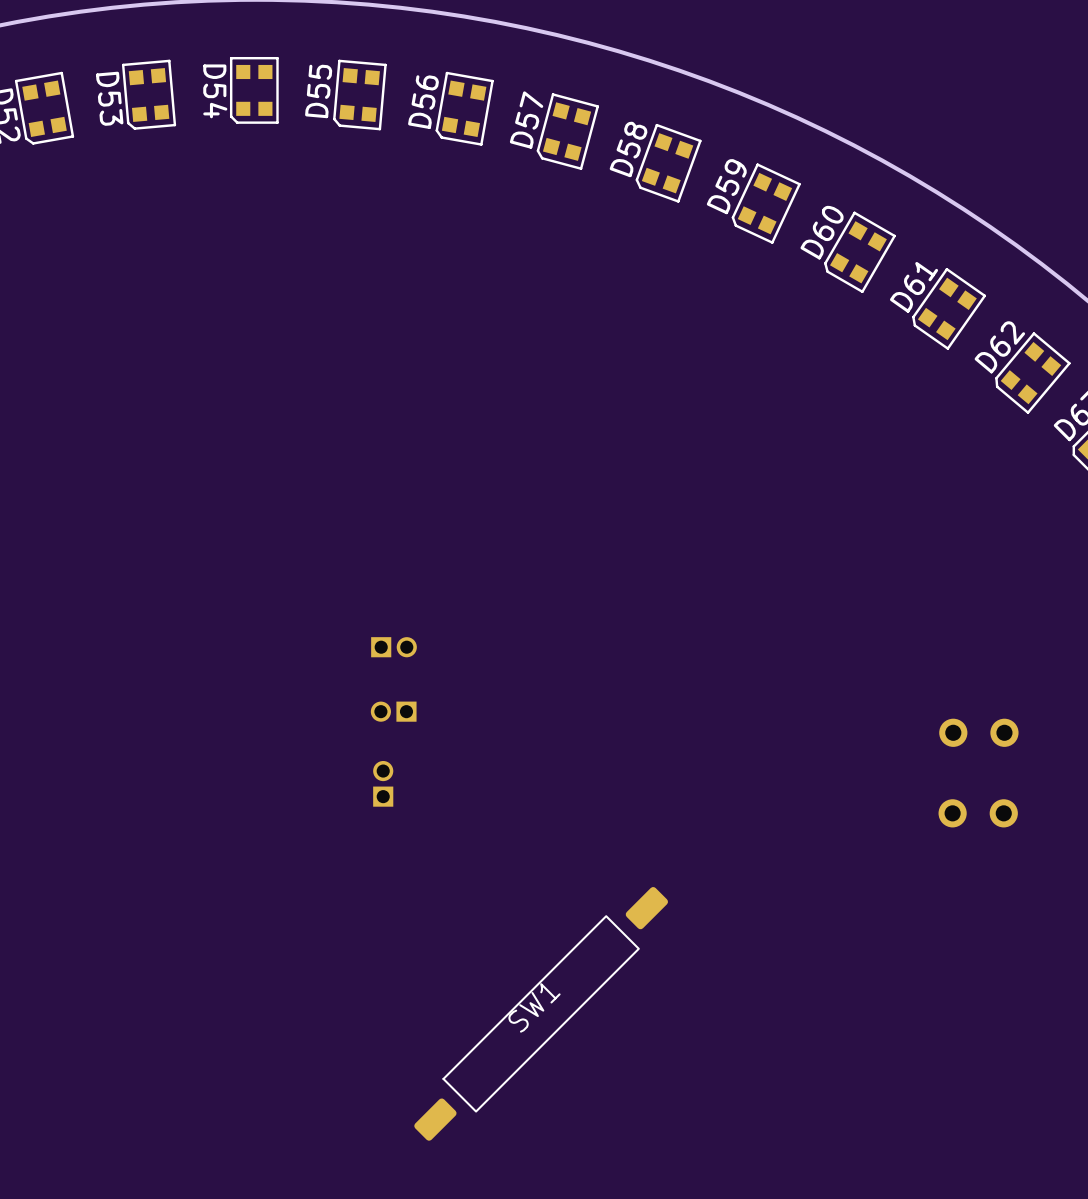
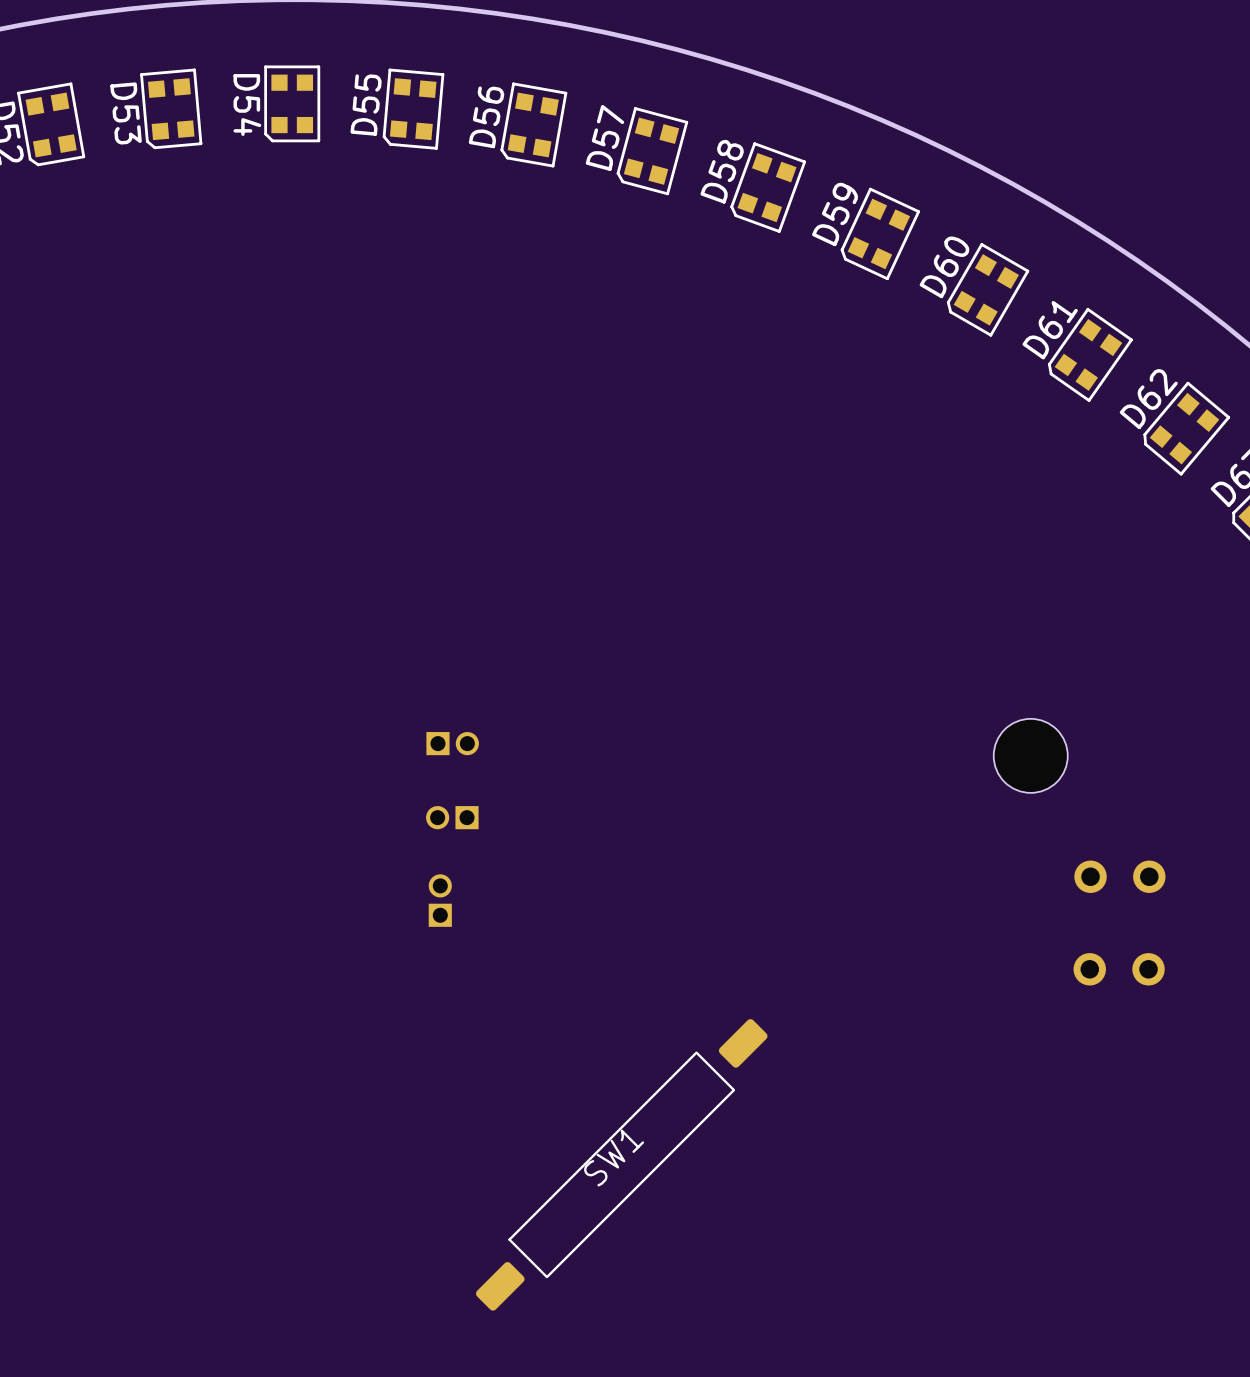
part: none -> (1030, 755)
part: (978, 732) -> none
part: none -> (1119, 876)
part: (978, 813) -> none
part: none -> (1119, 969)

